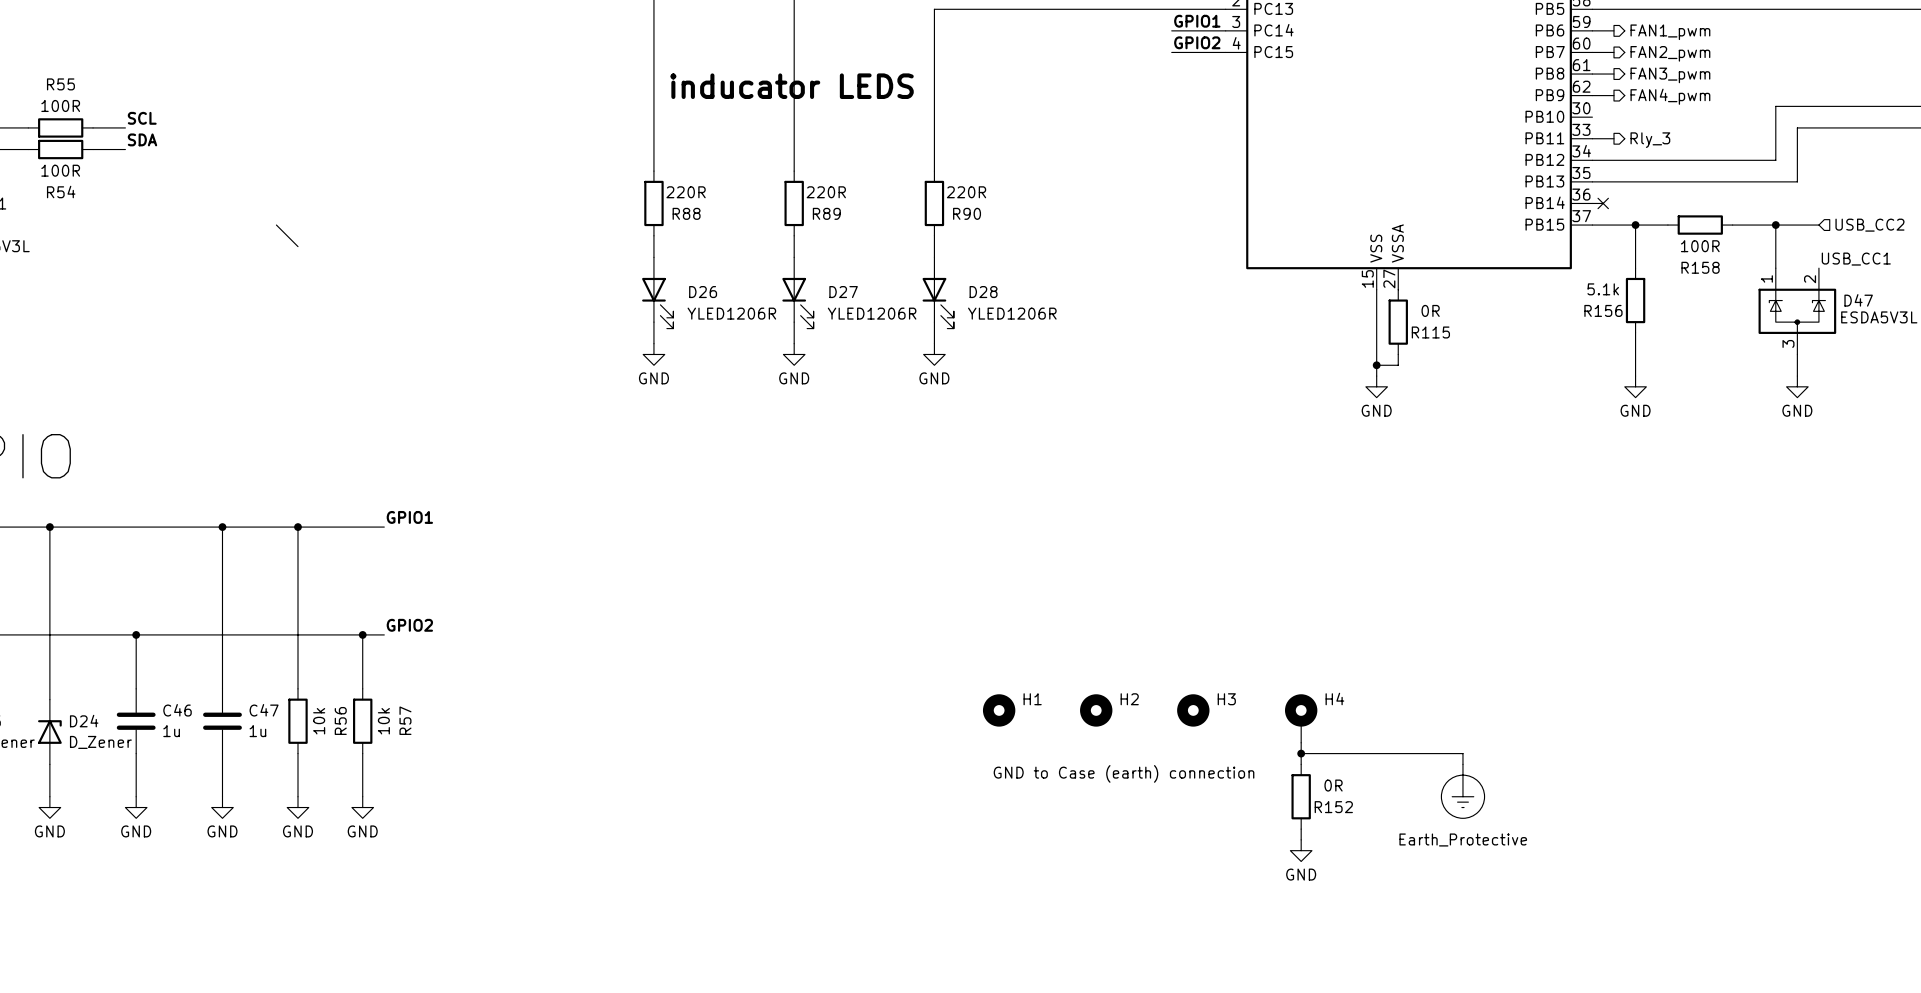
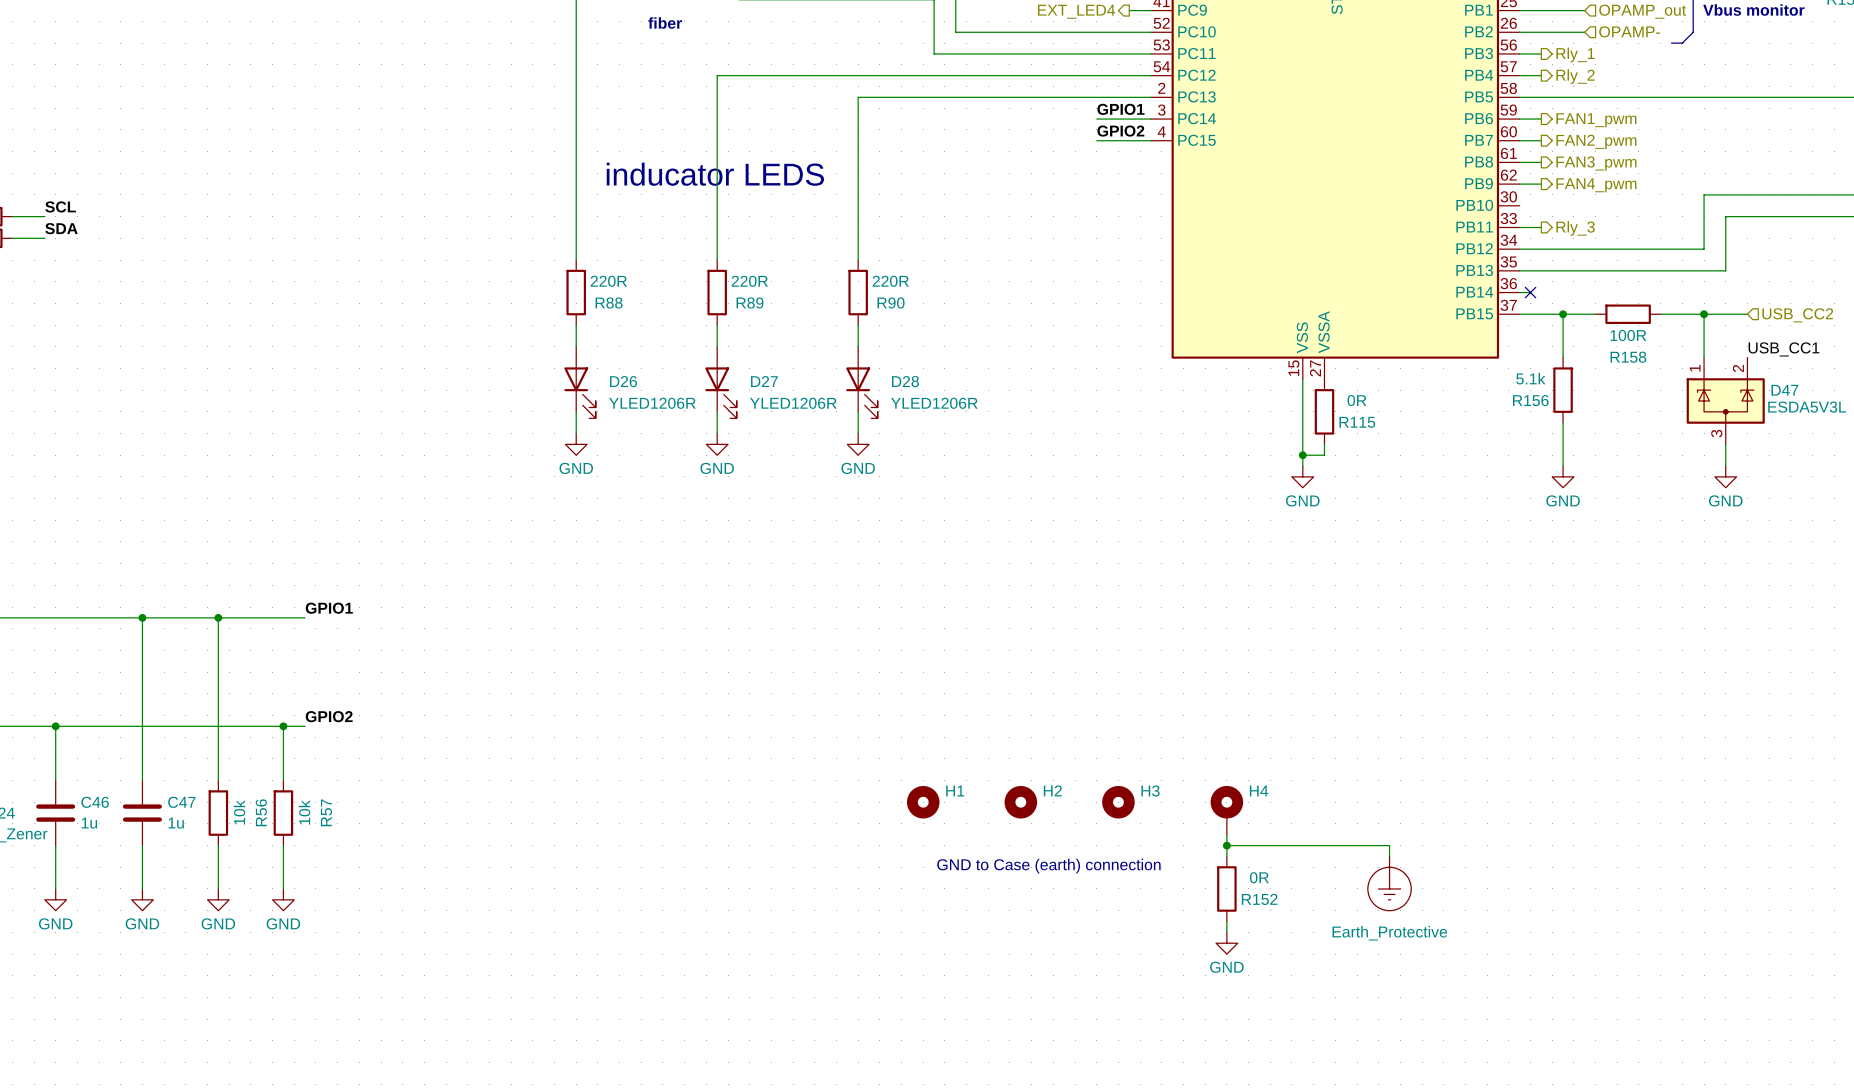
wire: (276, 225) (297, 246) -> none

